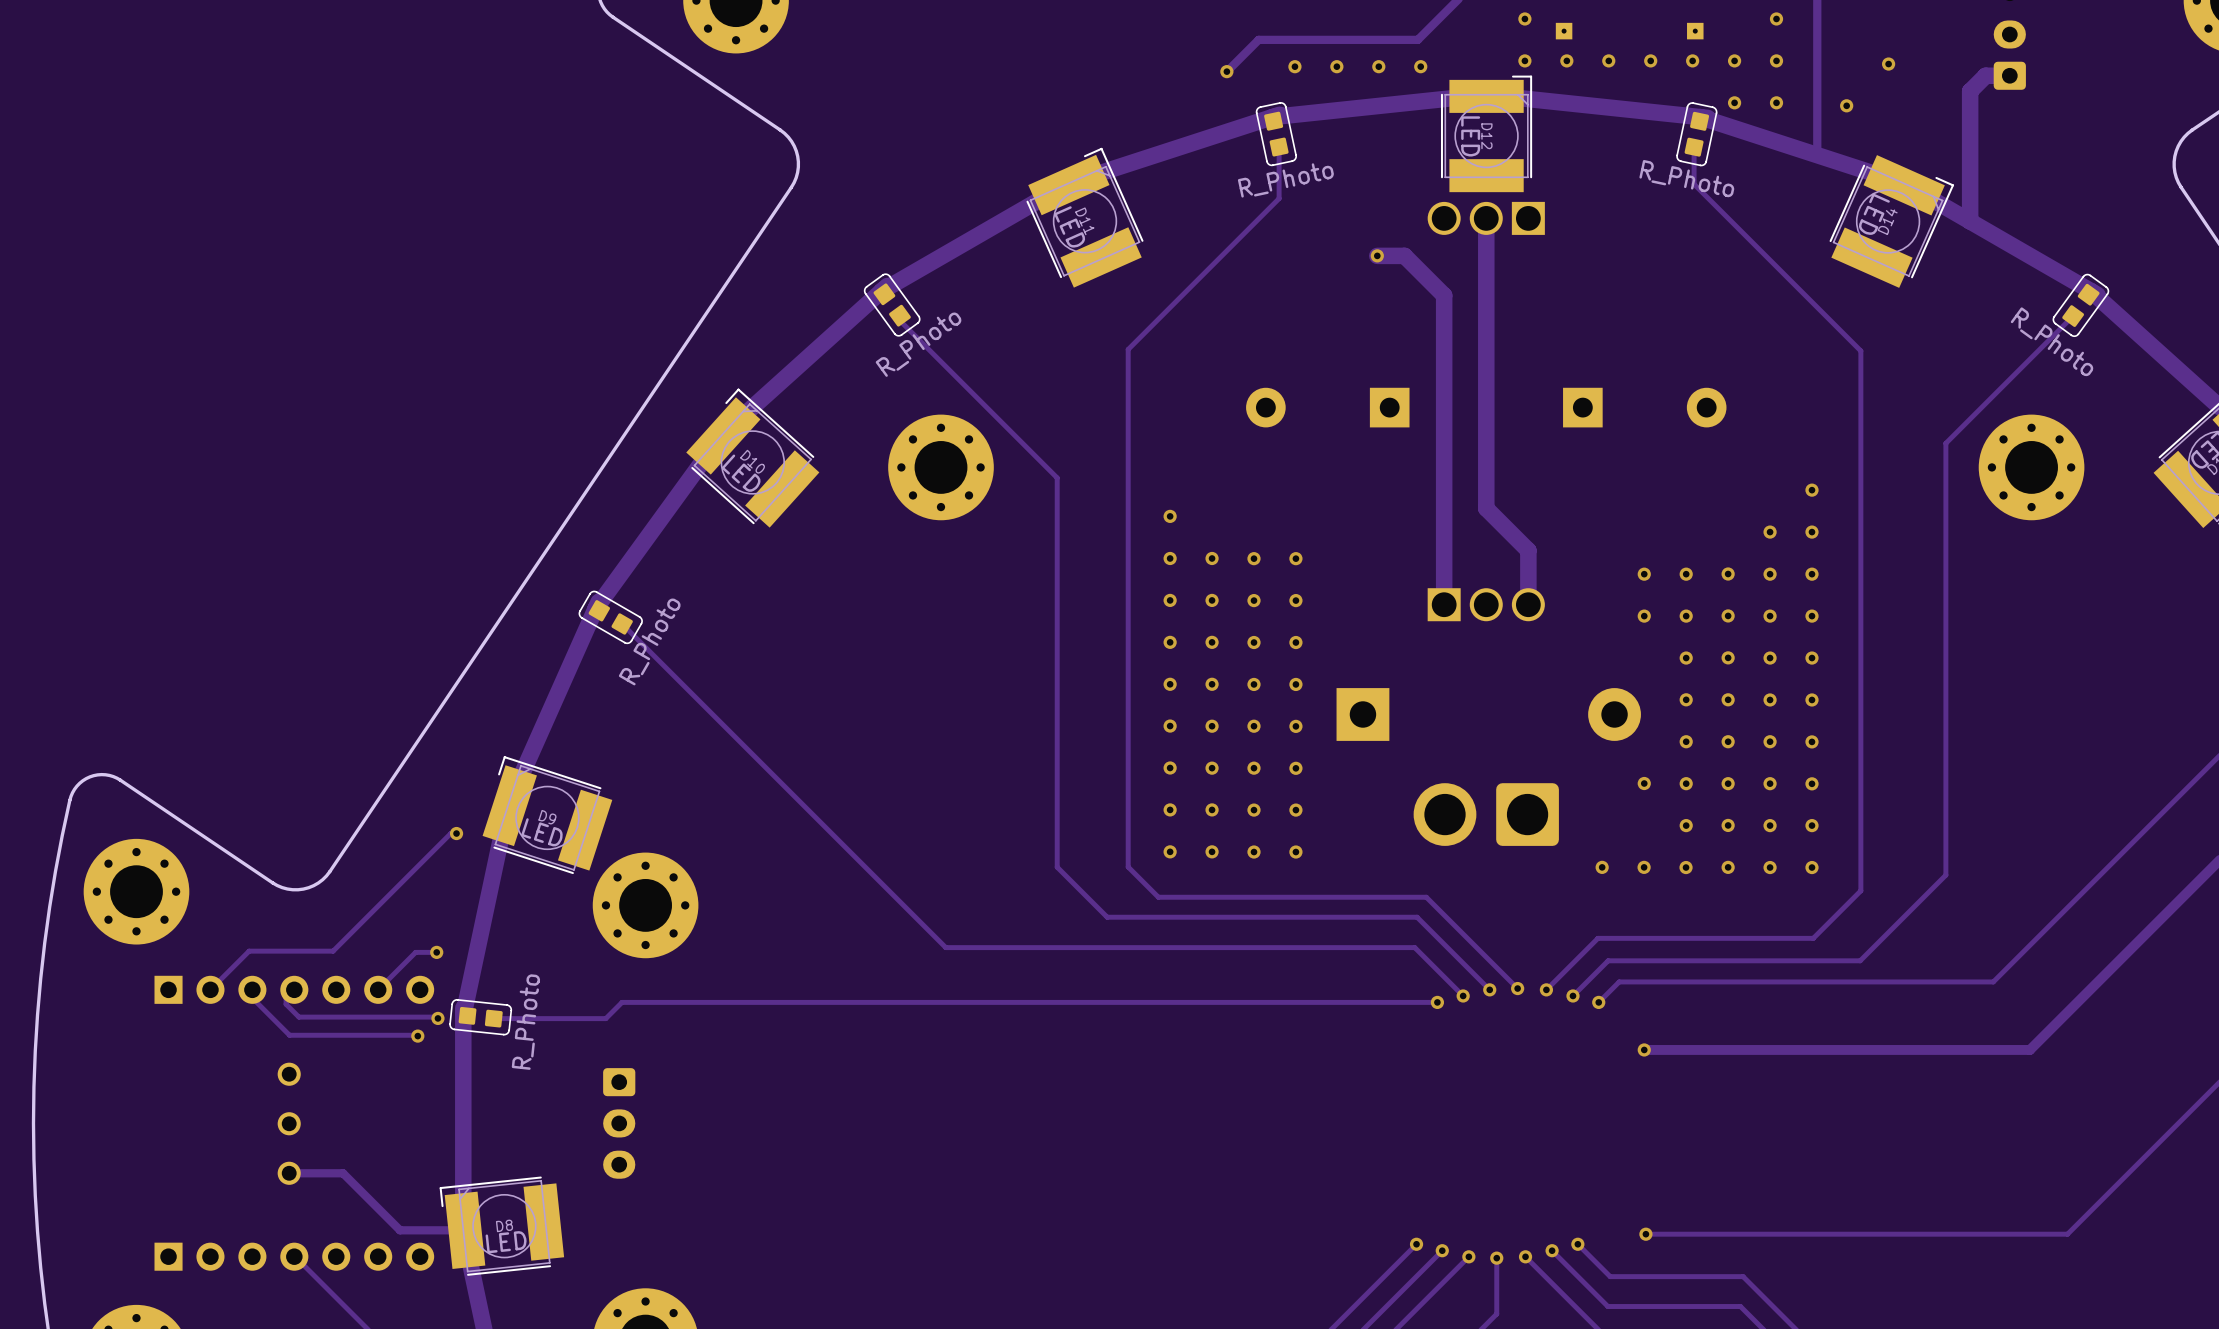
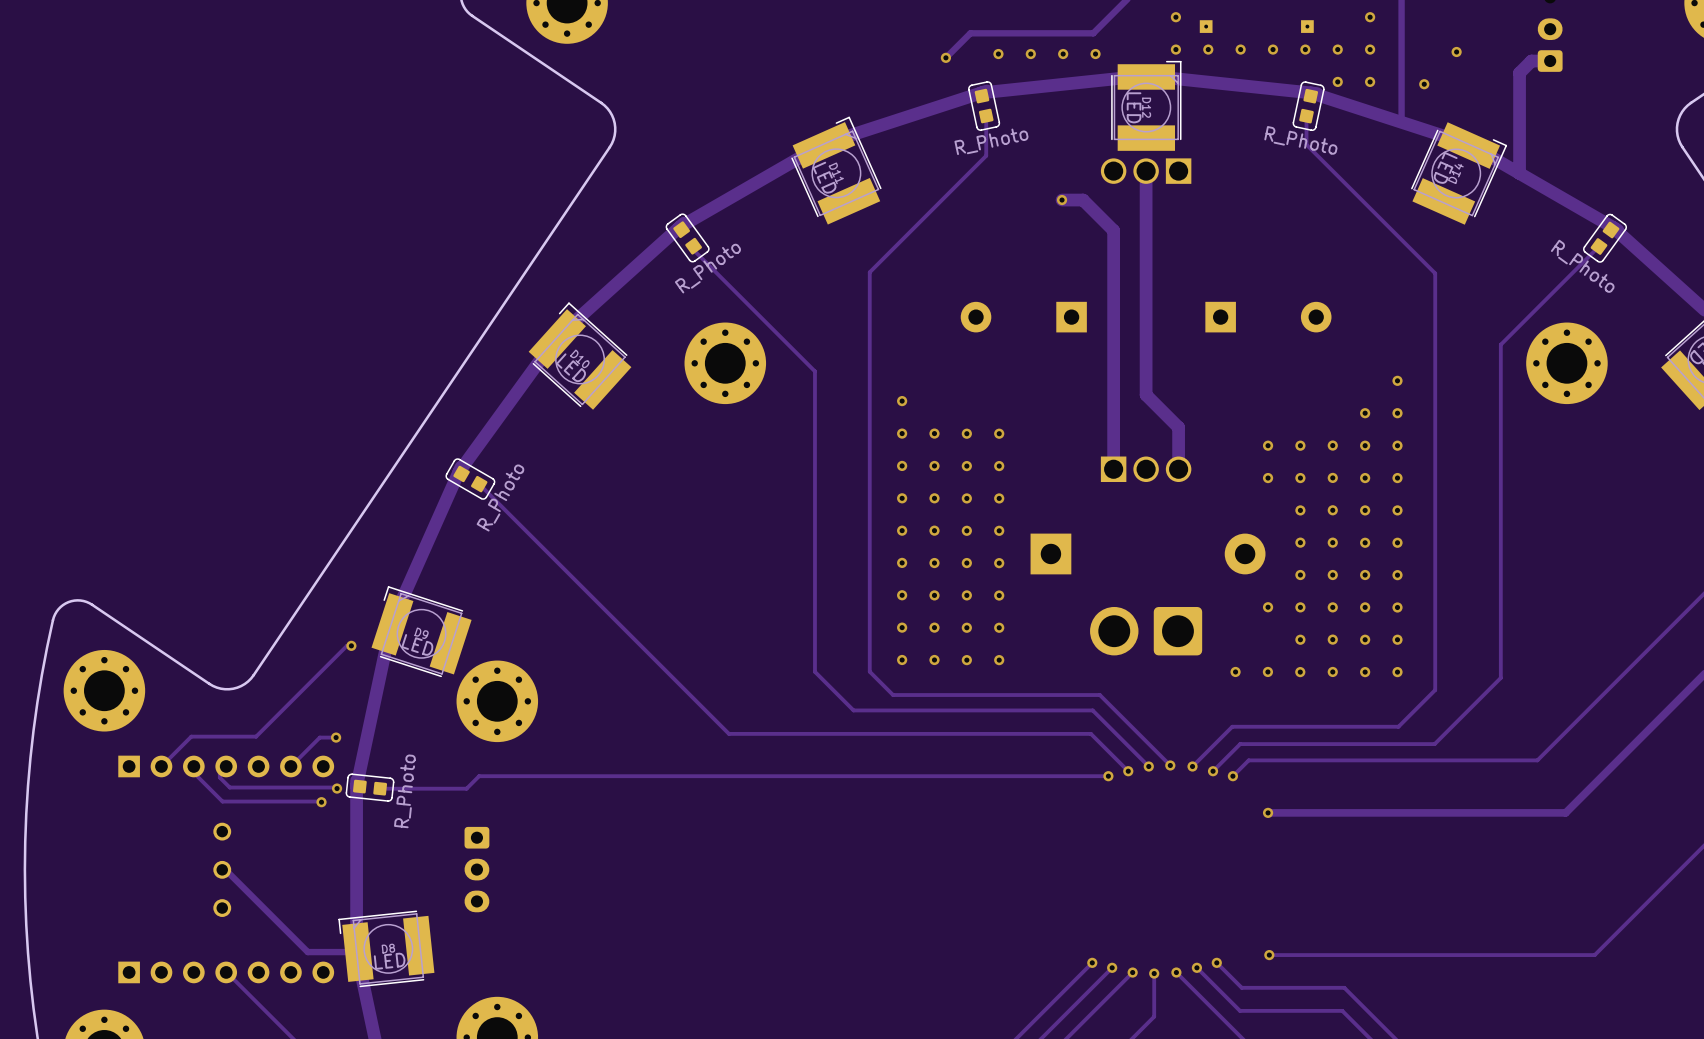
track: (343, 1173) (289, 1173) -> (263, 908) (225, 869) (222, 869)

